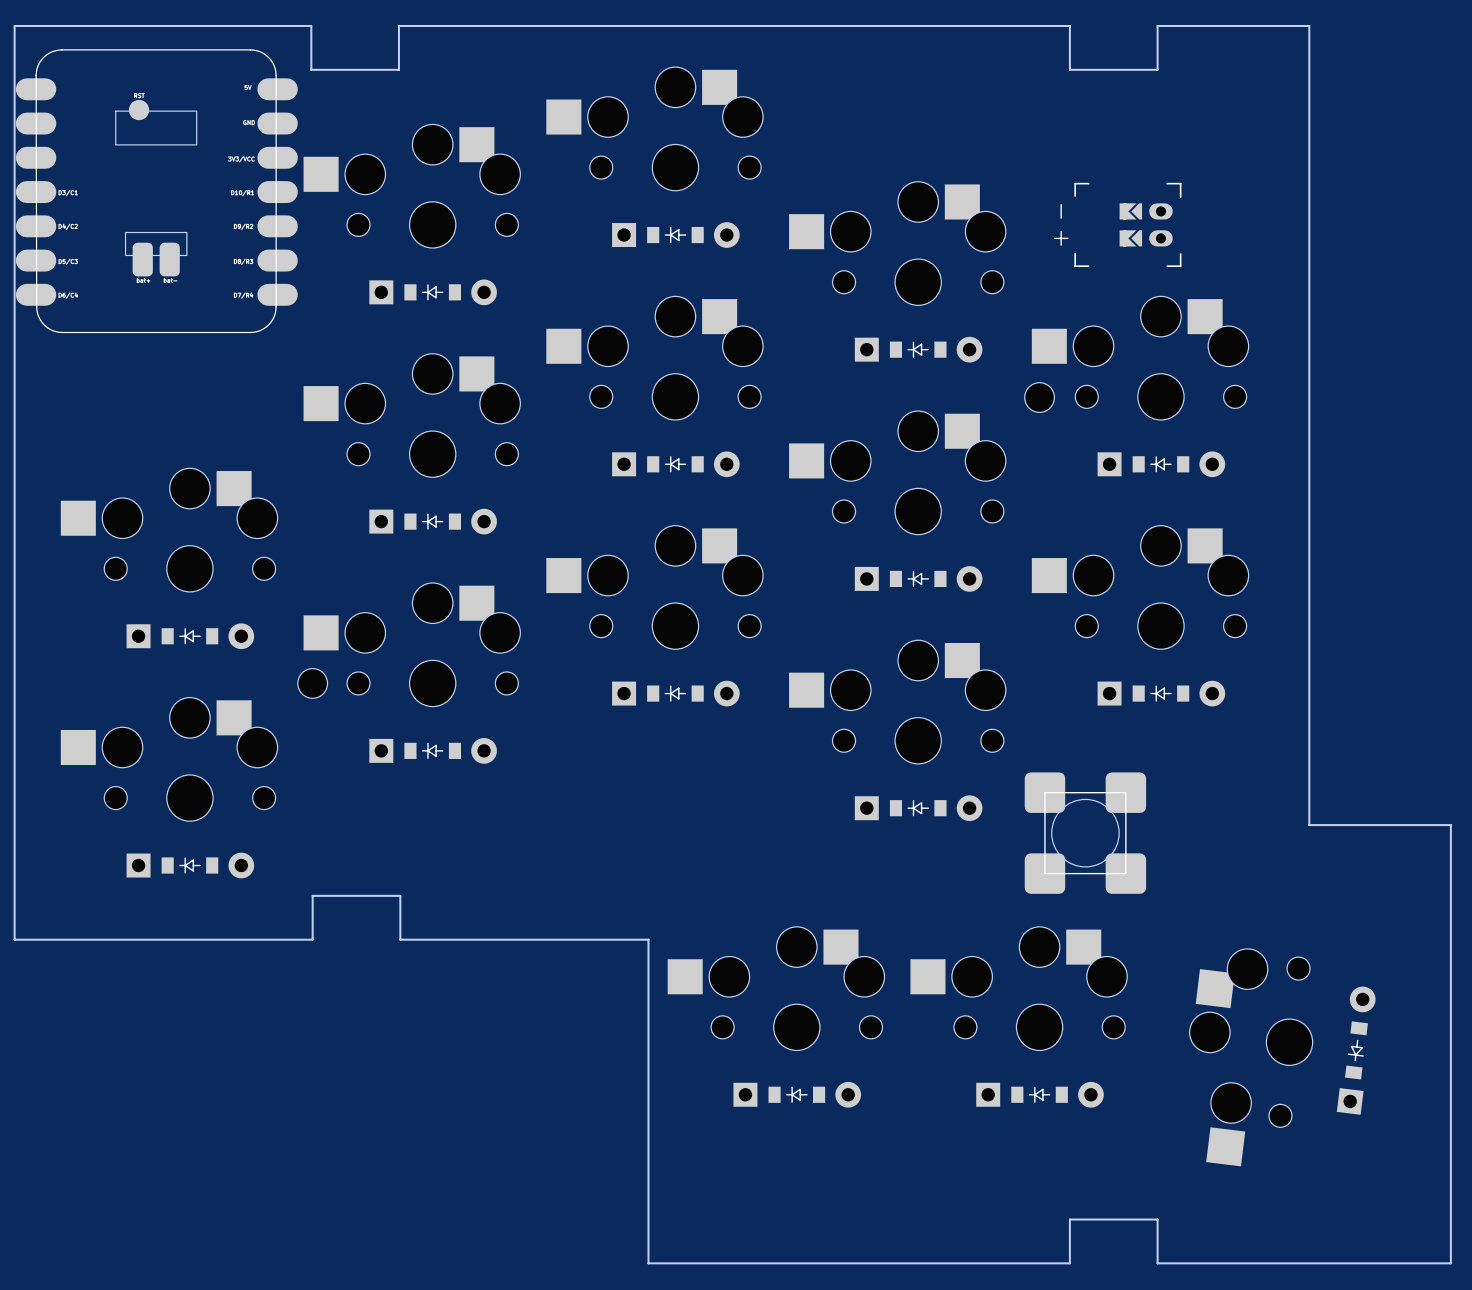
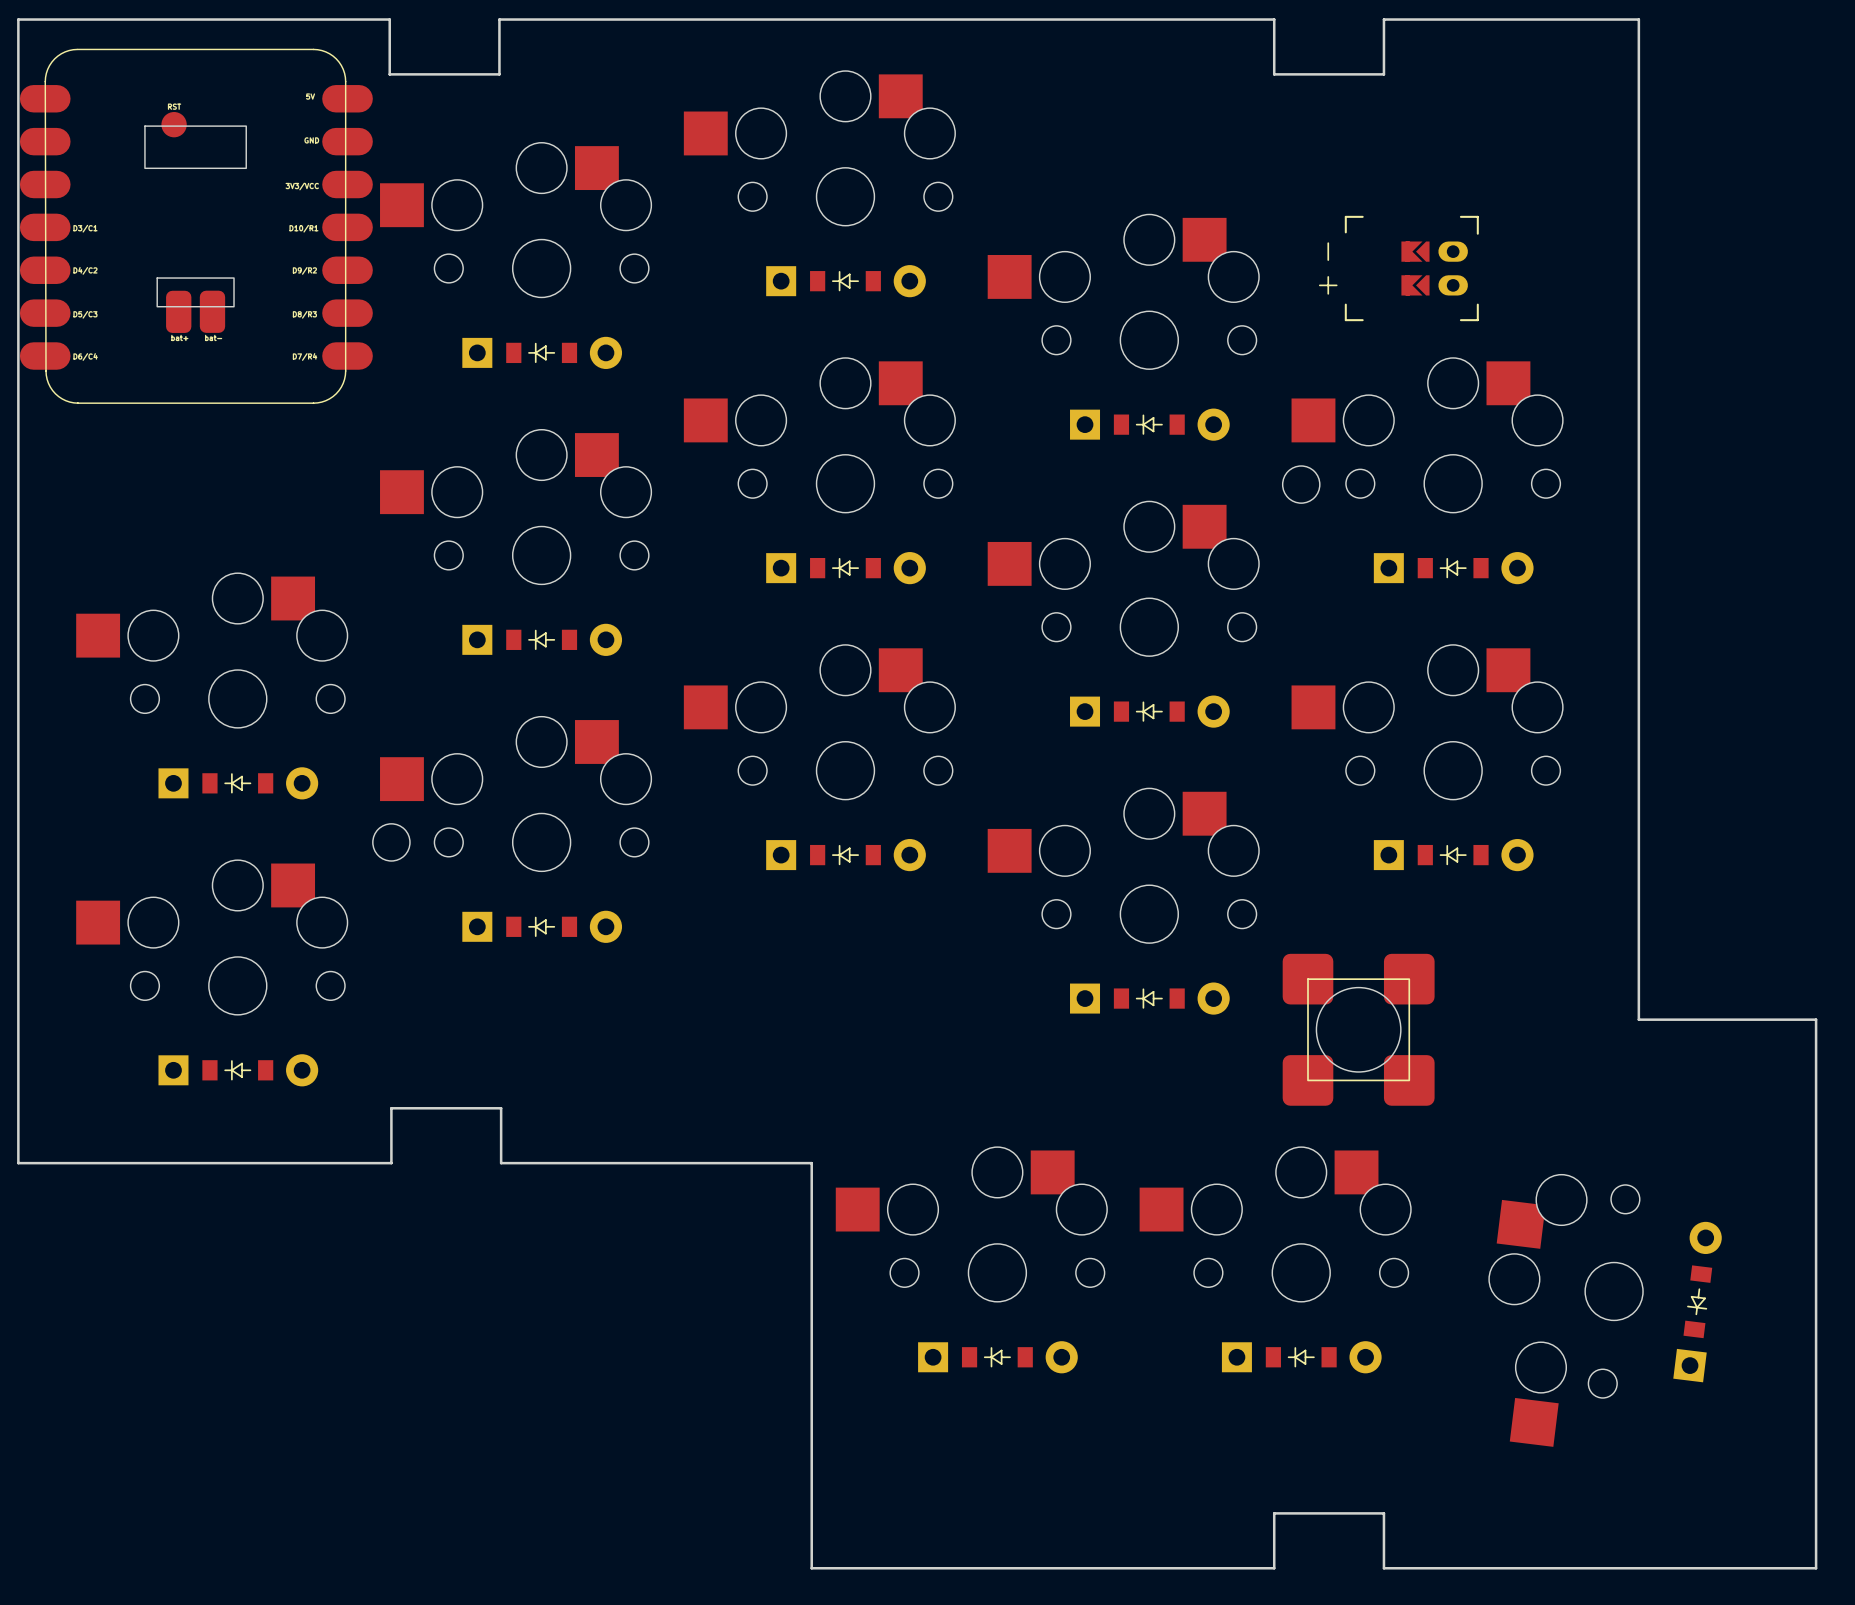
board edge: (1018, 25) (1069, 25) (1069, 69) -> (1274, 19) (1274, 74) (1339, 74)
board edge: (1157, 25) (1157, 69) (1105, 69) -> (1448, 19) (1383, 19) (1383, 74)
board edge: (1069, 1219) (1069, 1263) (1018, 1263) -> (1339, 1513) (1274, 1513) (1274, 1568)
board edge: (1105, 1219) (1157, 1219) (1157, 1263) -> (1383, 1513) (1383, 1568) (1448, 1568)

